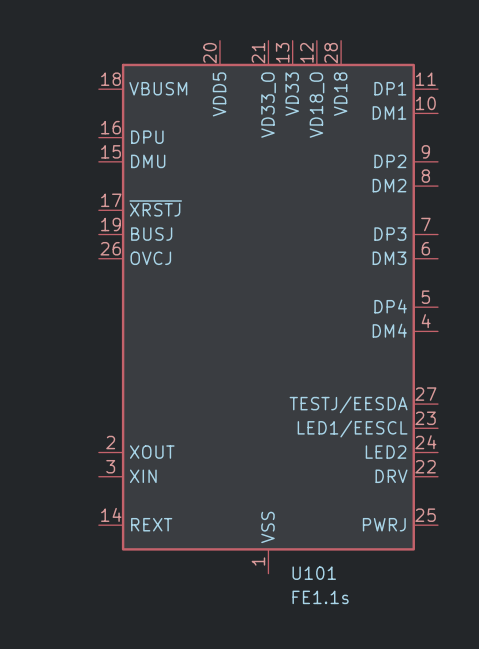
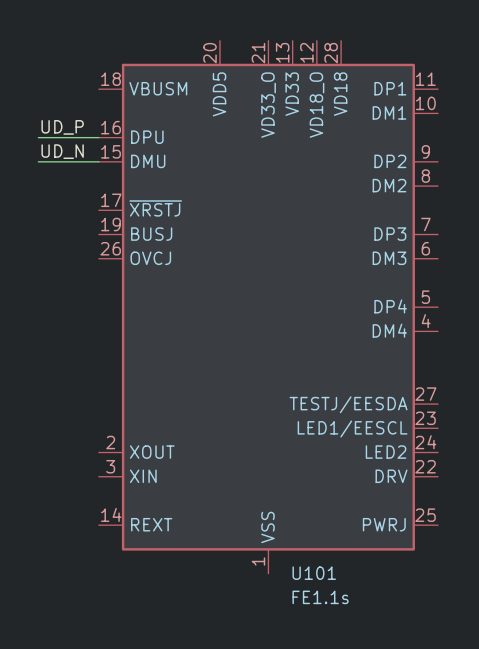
label: none -> UD_P (62, 127)
wire: none -> (38, 137) (98, 137)
label: none -> UD_N (62, 151)
wire: none -> (38, 161) (98, 161)

